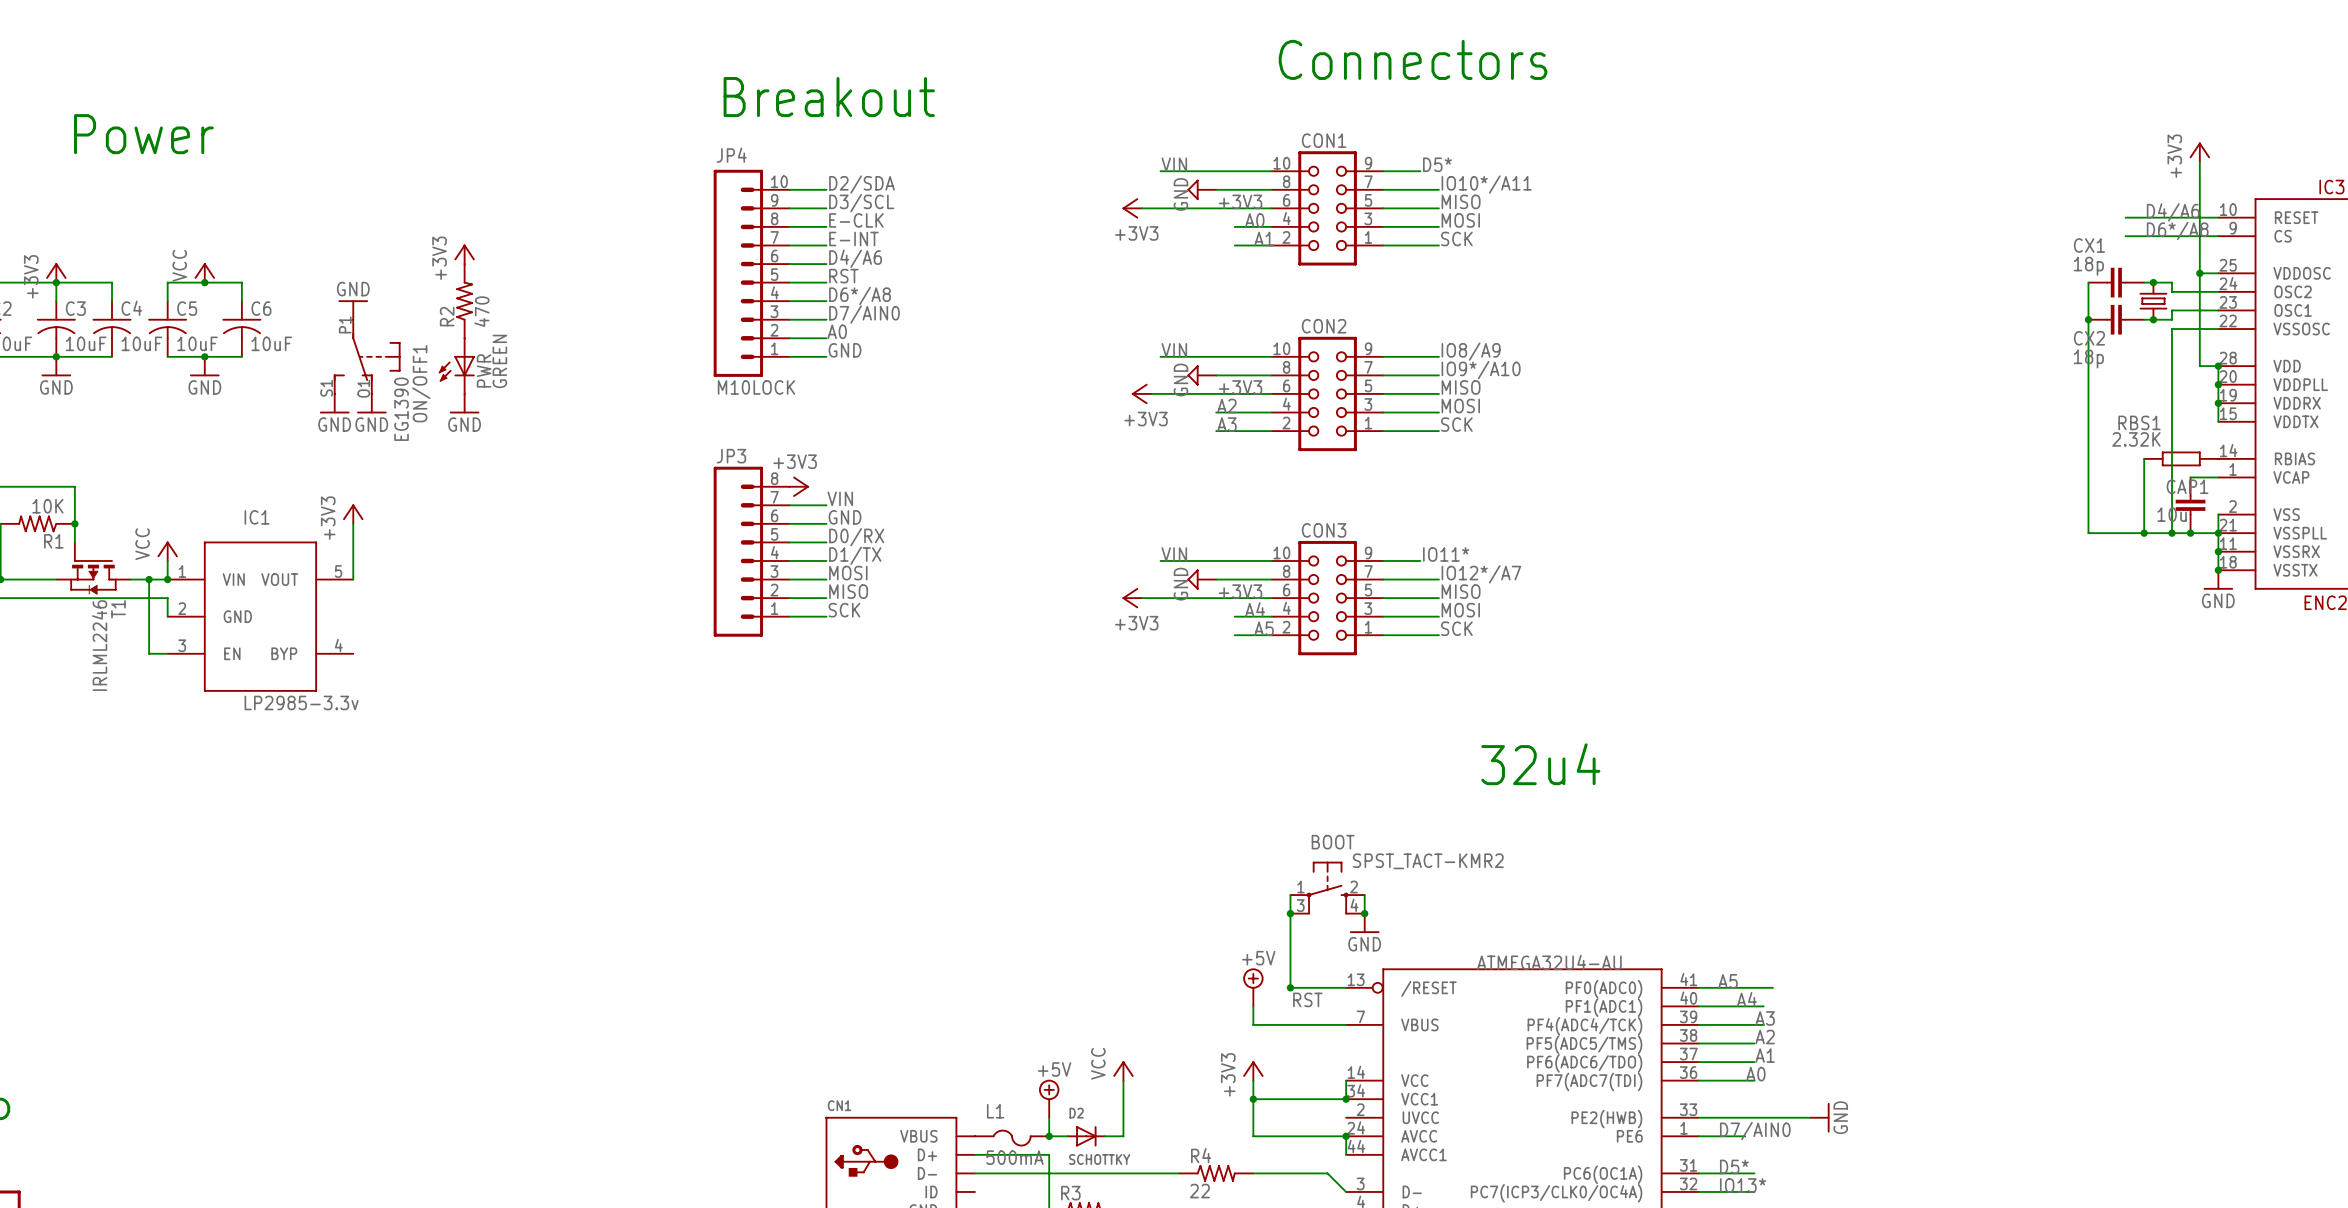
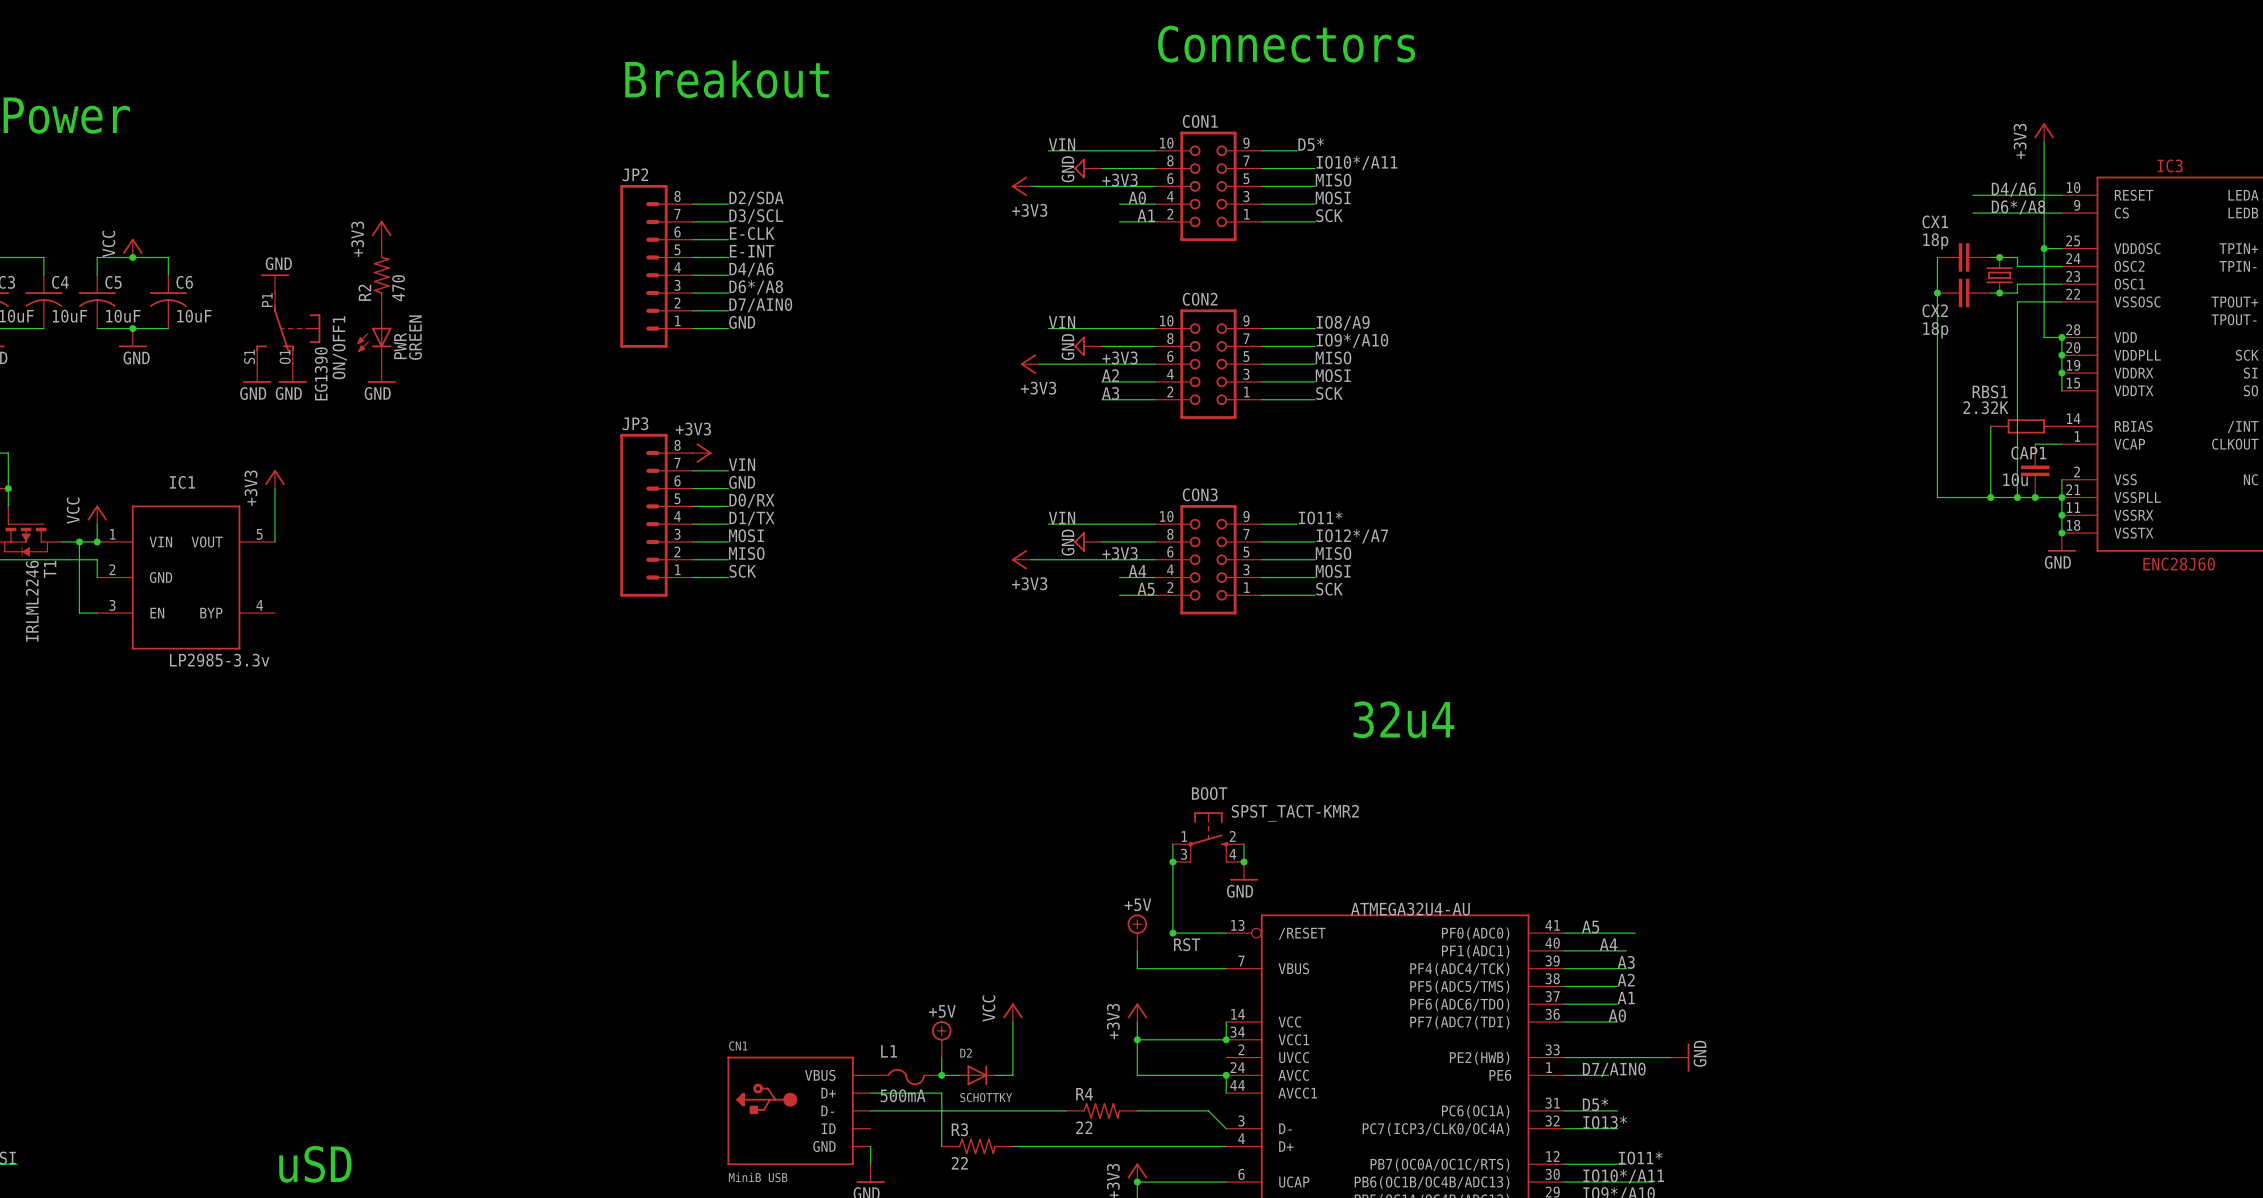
label: D2/SDA (861, 184) -> none
wire: (789, 189) (826, 189) -> none
label: D3/SCL (861, 203) -> none
wire: (789, 208) (826, 208) -> none
label: E-CLK (856, 220) -> D2/SDA (756, 198)
label: E-INT (853, 239) -> D3/SCL (756, 216)
label: D4/A6 (855, 258) -> E-CLK (752, 233)
JP4: M10LOCK (751, 273) -> none
label: RST (843, 276) -> E-INT (752, 251)
JP2: none -> (656, 266)
label: D6*/A8 (860, 295) -> D4/A6 (751, 269)
label: D7/AIN0 (864, 314) -> D6*/A8 (756, 287)
label: A0 (837, 331) -> D7/AIN0 (760, 305)

